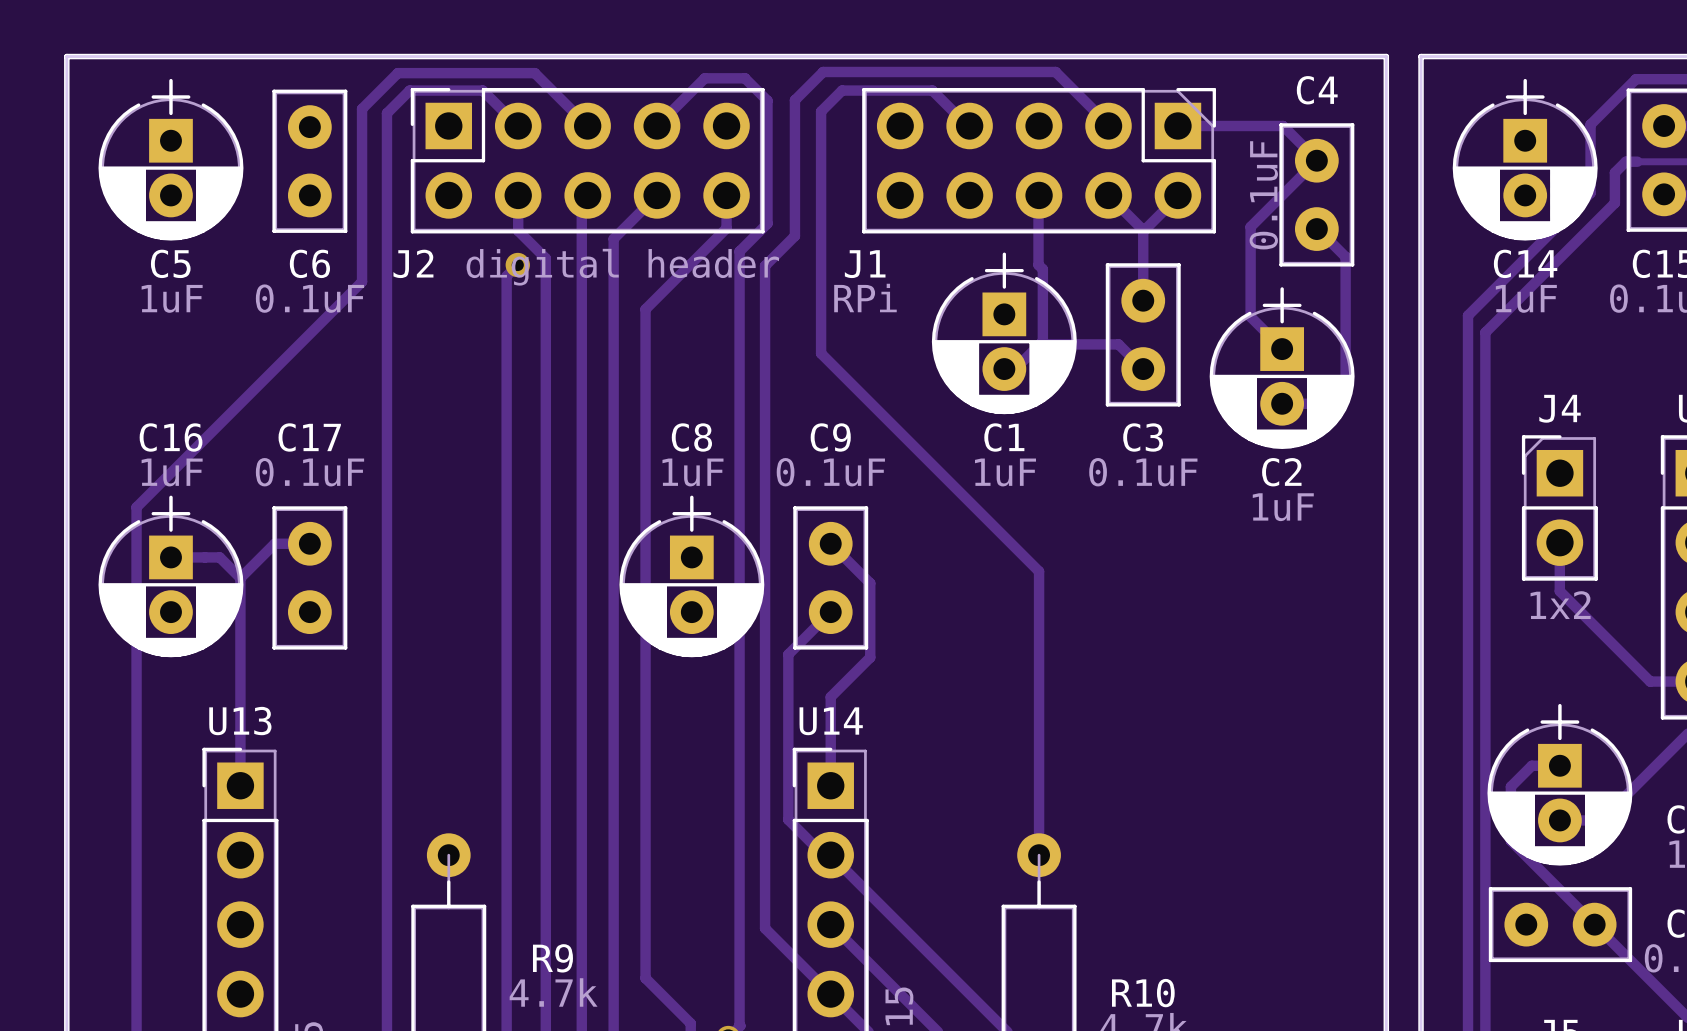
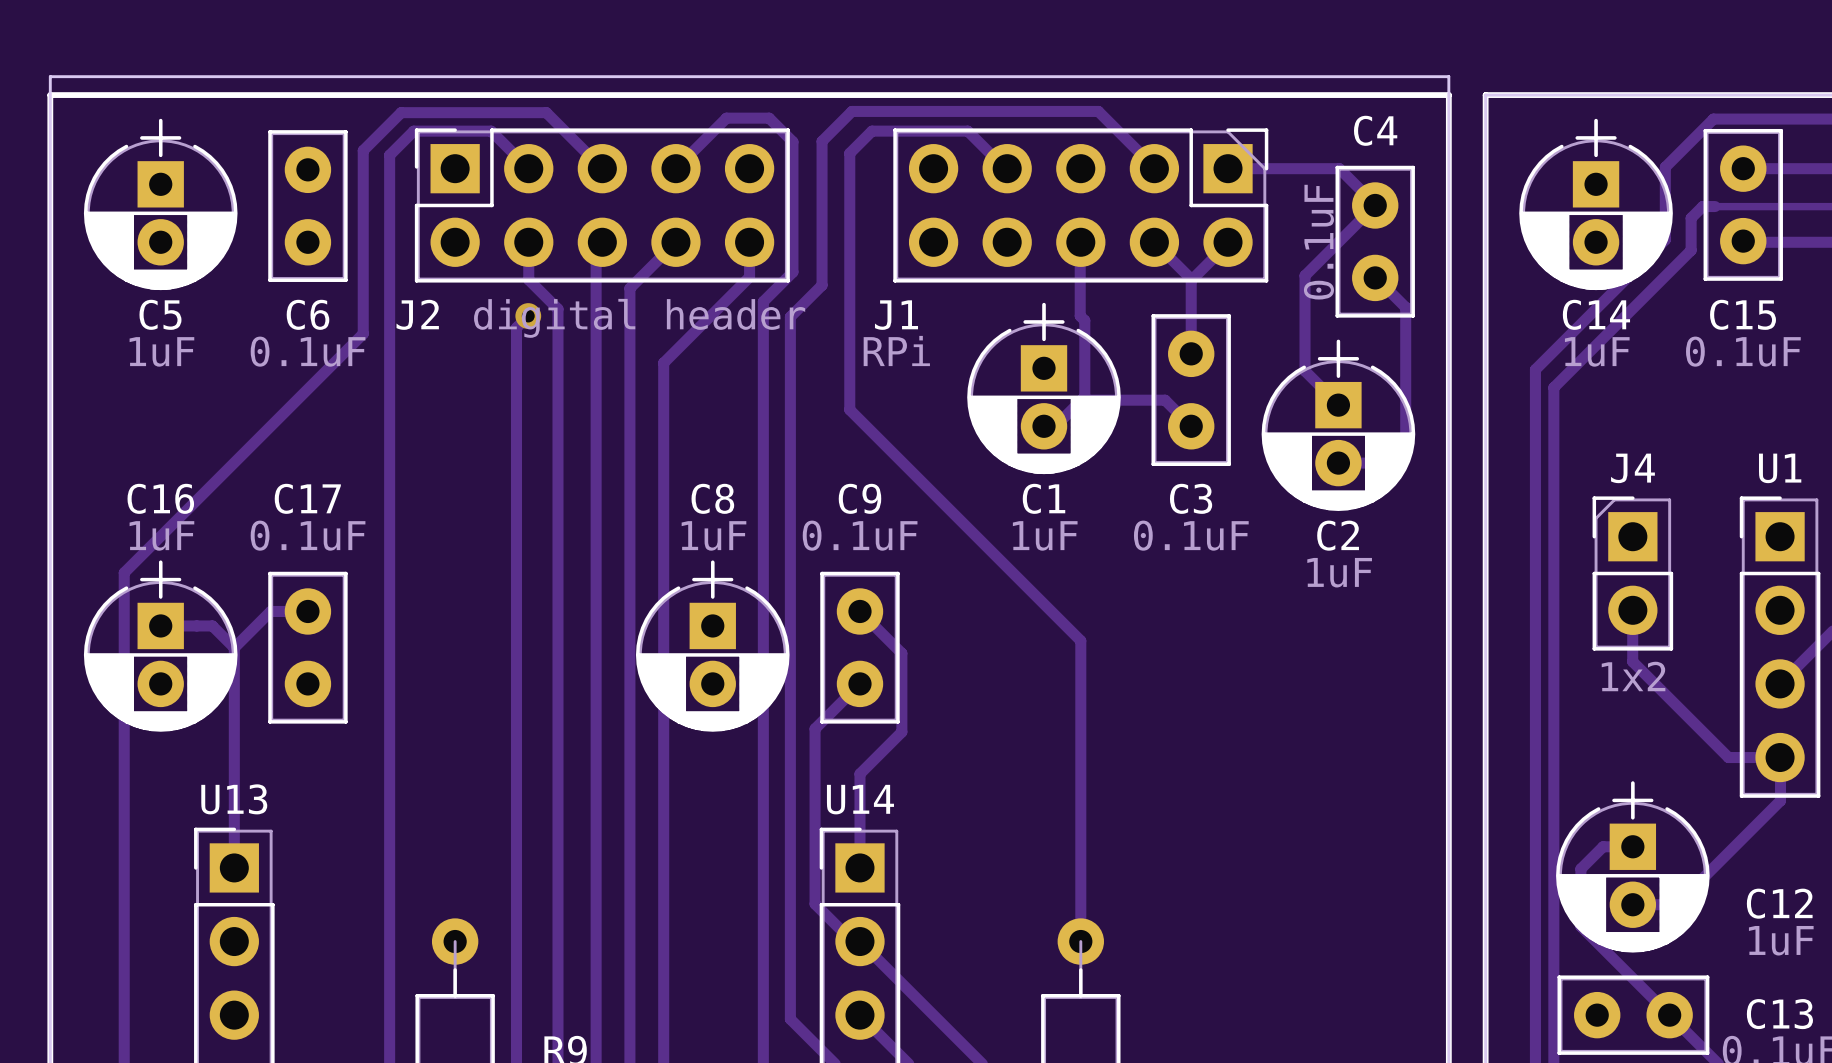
board edge: (66, 56) (1386, 56) -> (50, 95) (50, 76) (1448, 76) (1448, 95)

